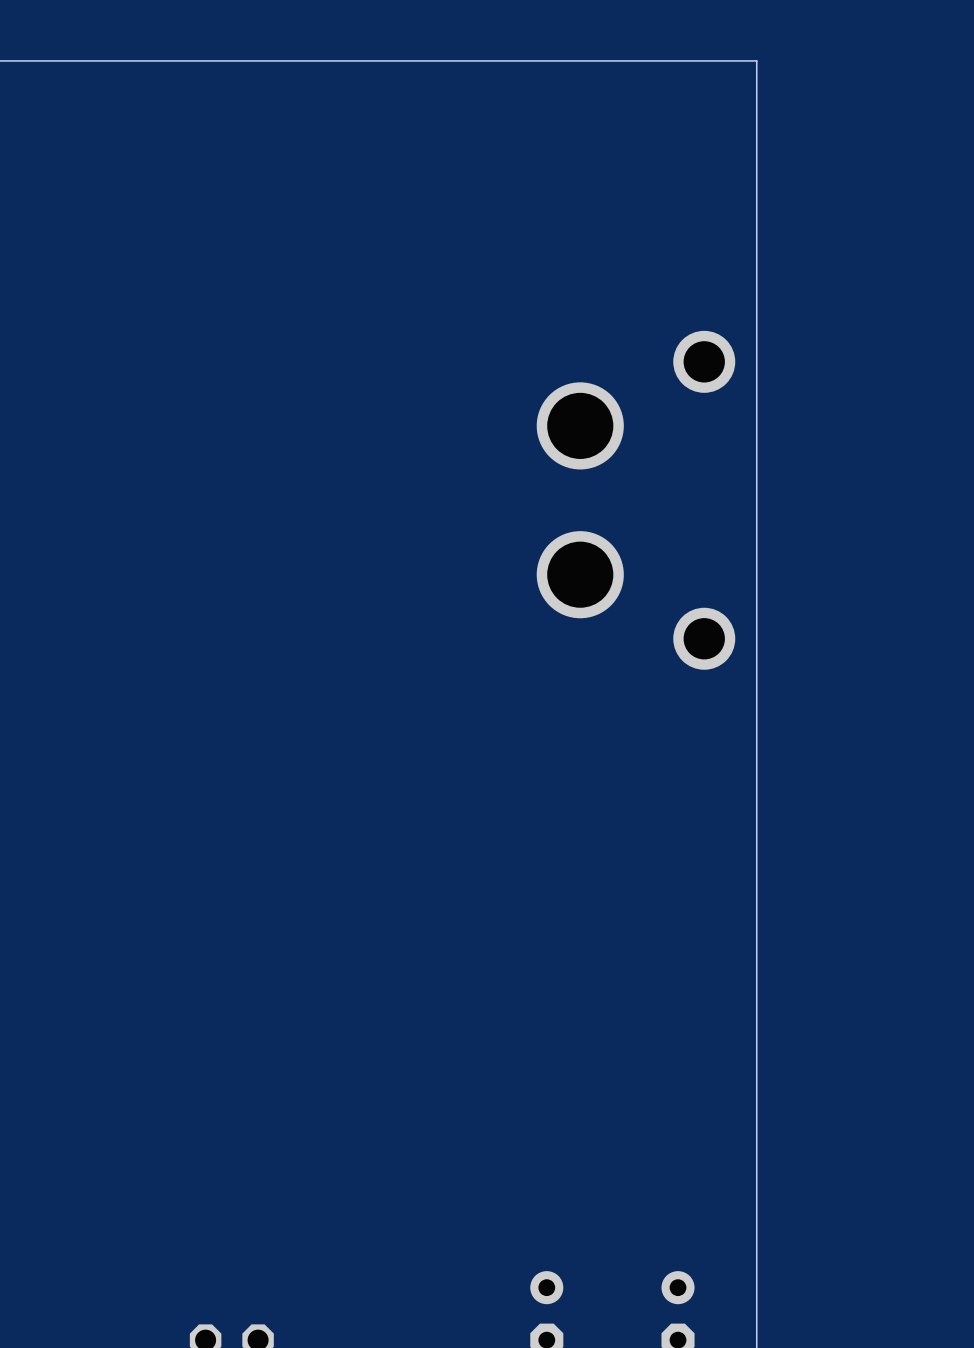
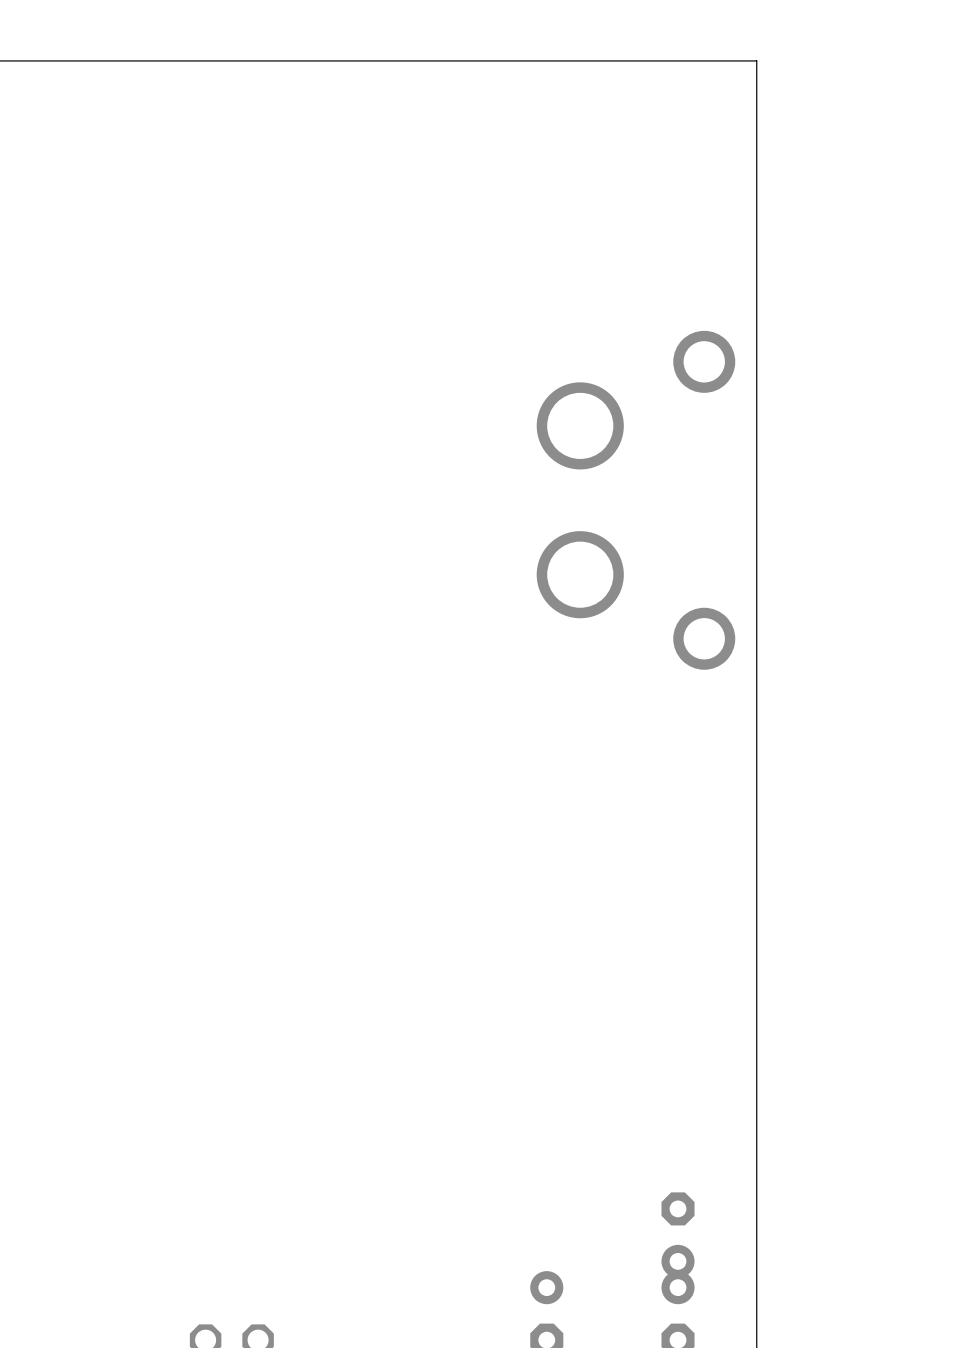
part: none -> (678, 1235)

